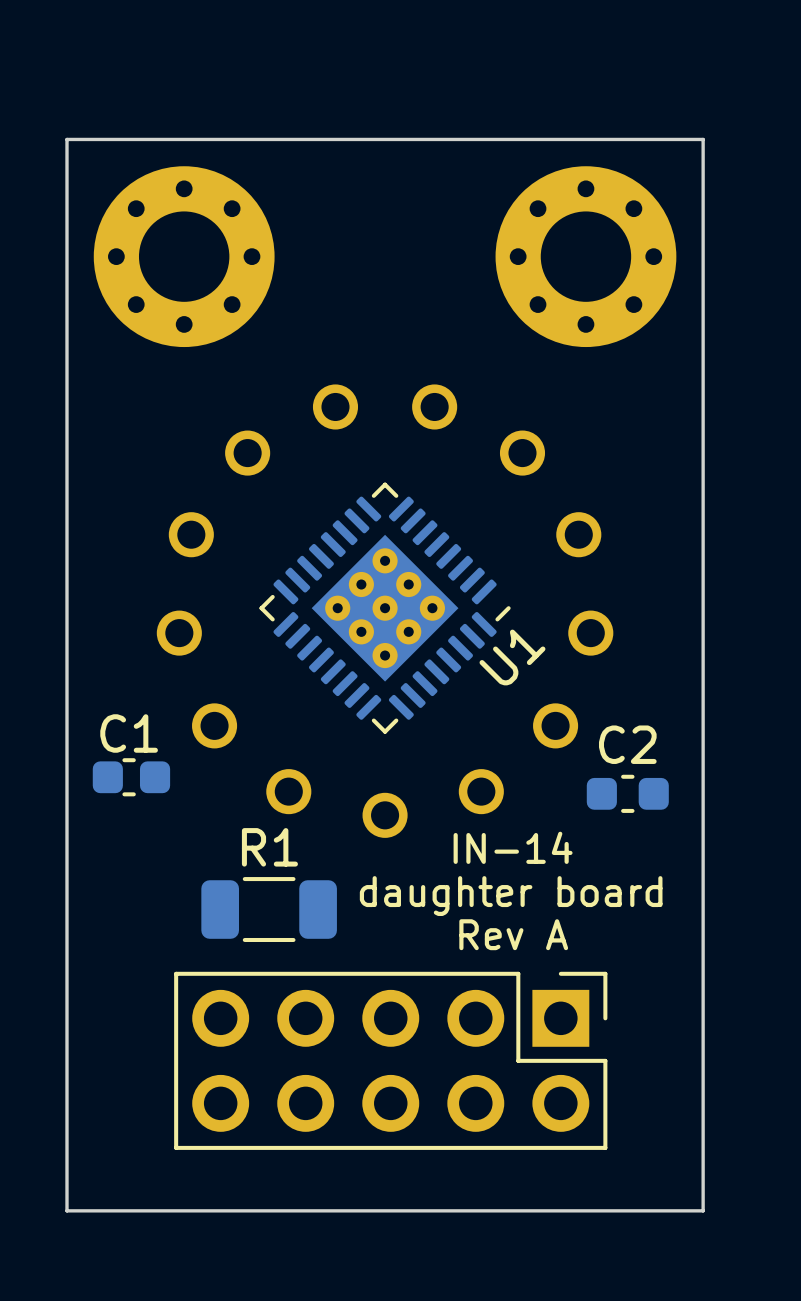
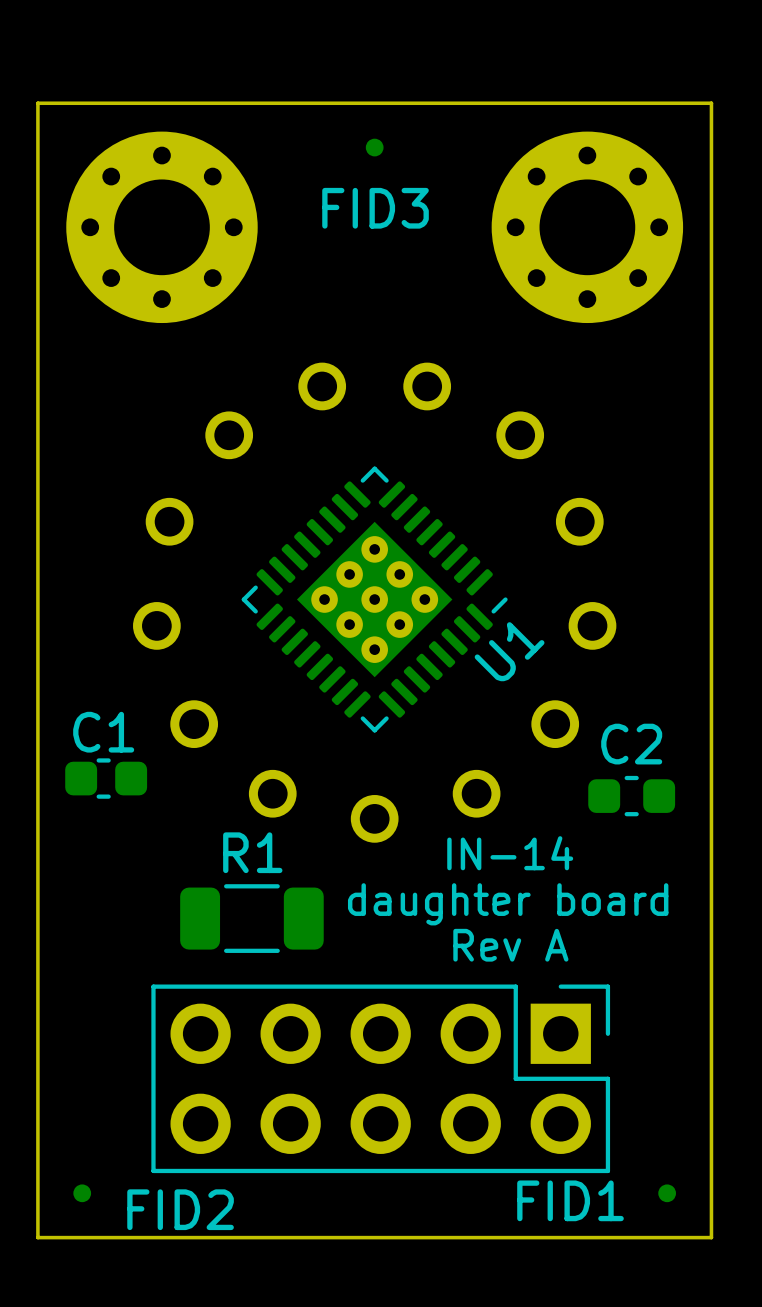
FID3: none -> (374, 147)
FID2: none -> (82, 1193)
FID1: none -> (667, 1193)

